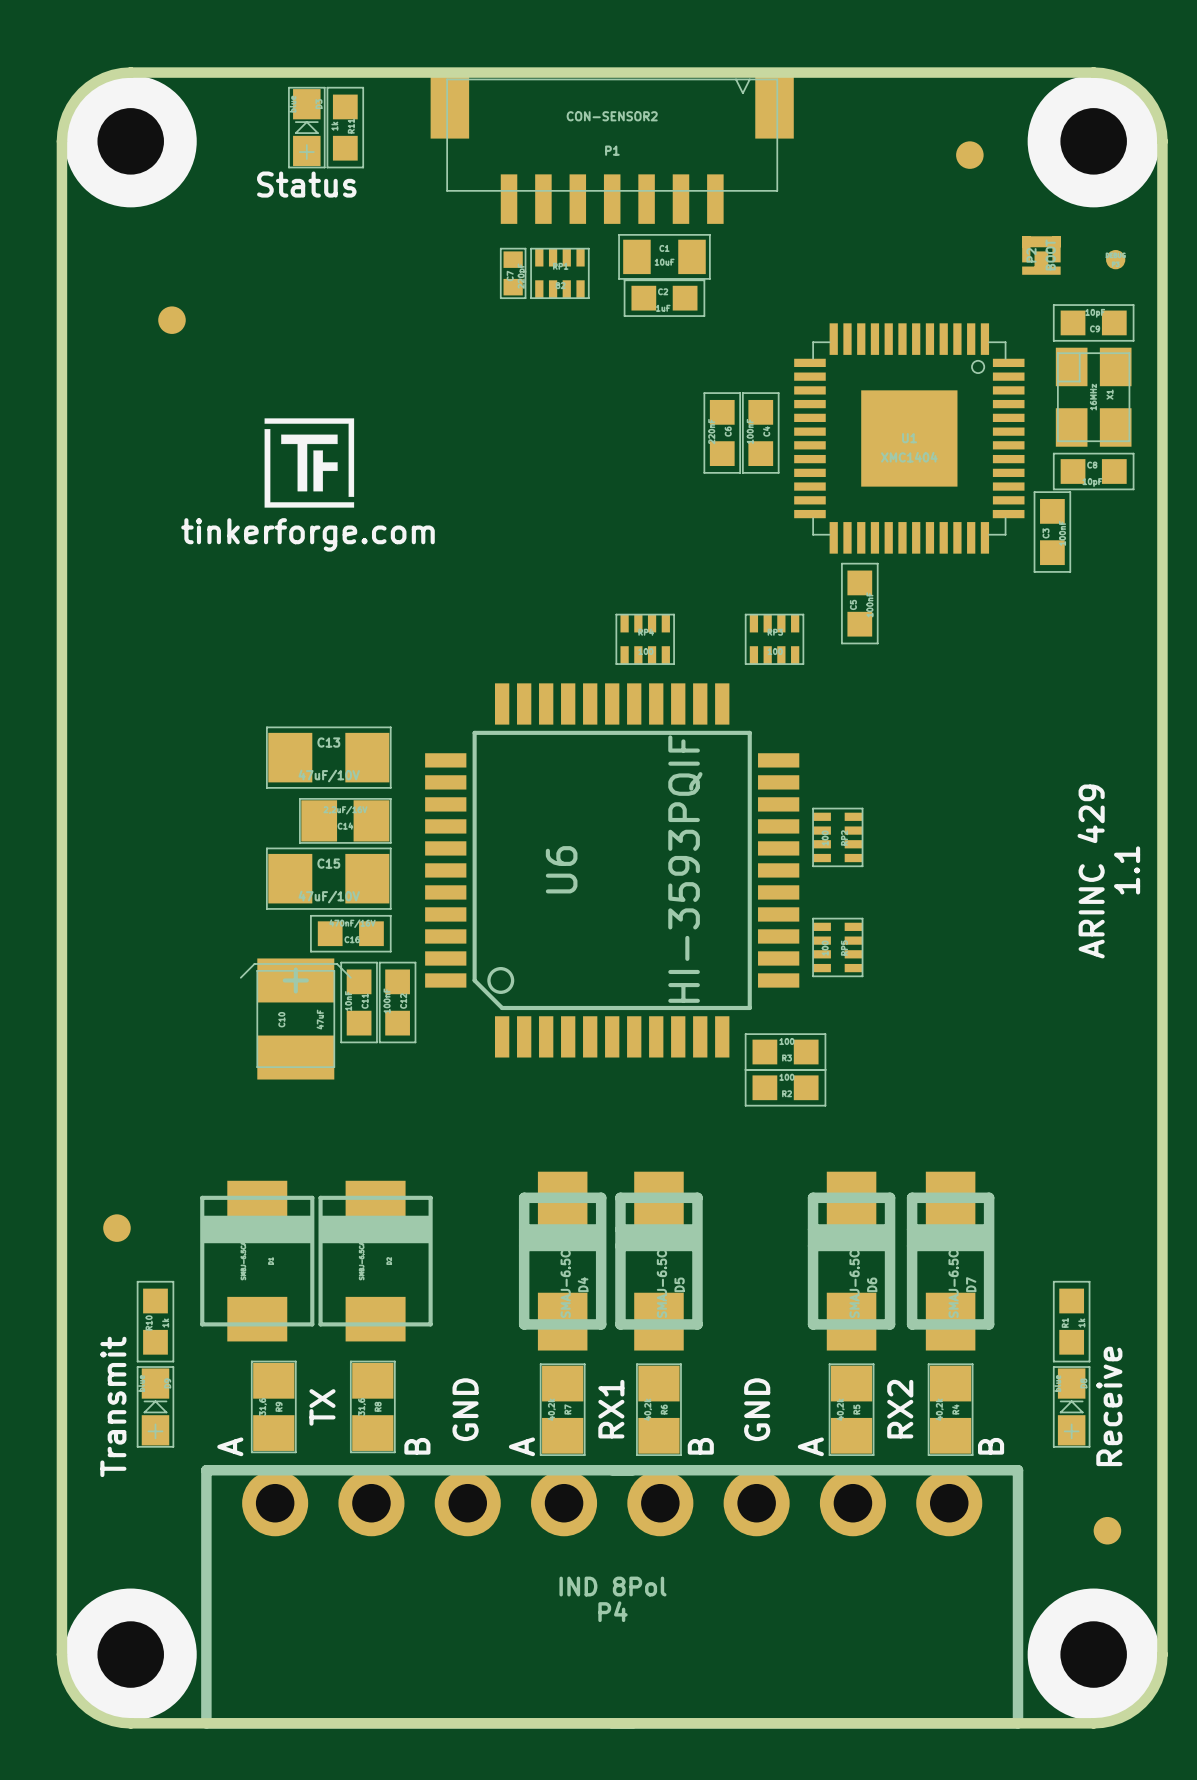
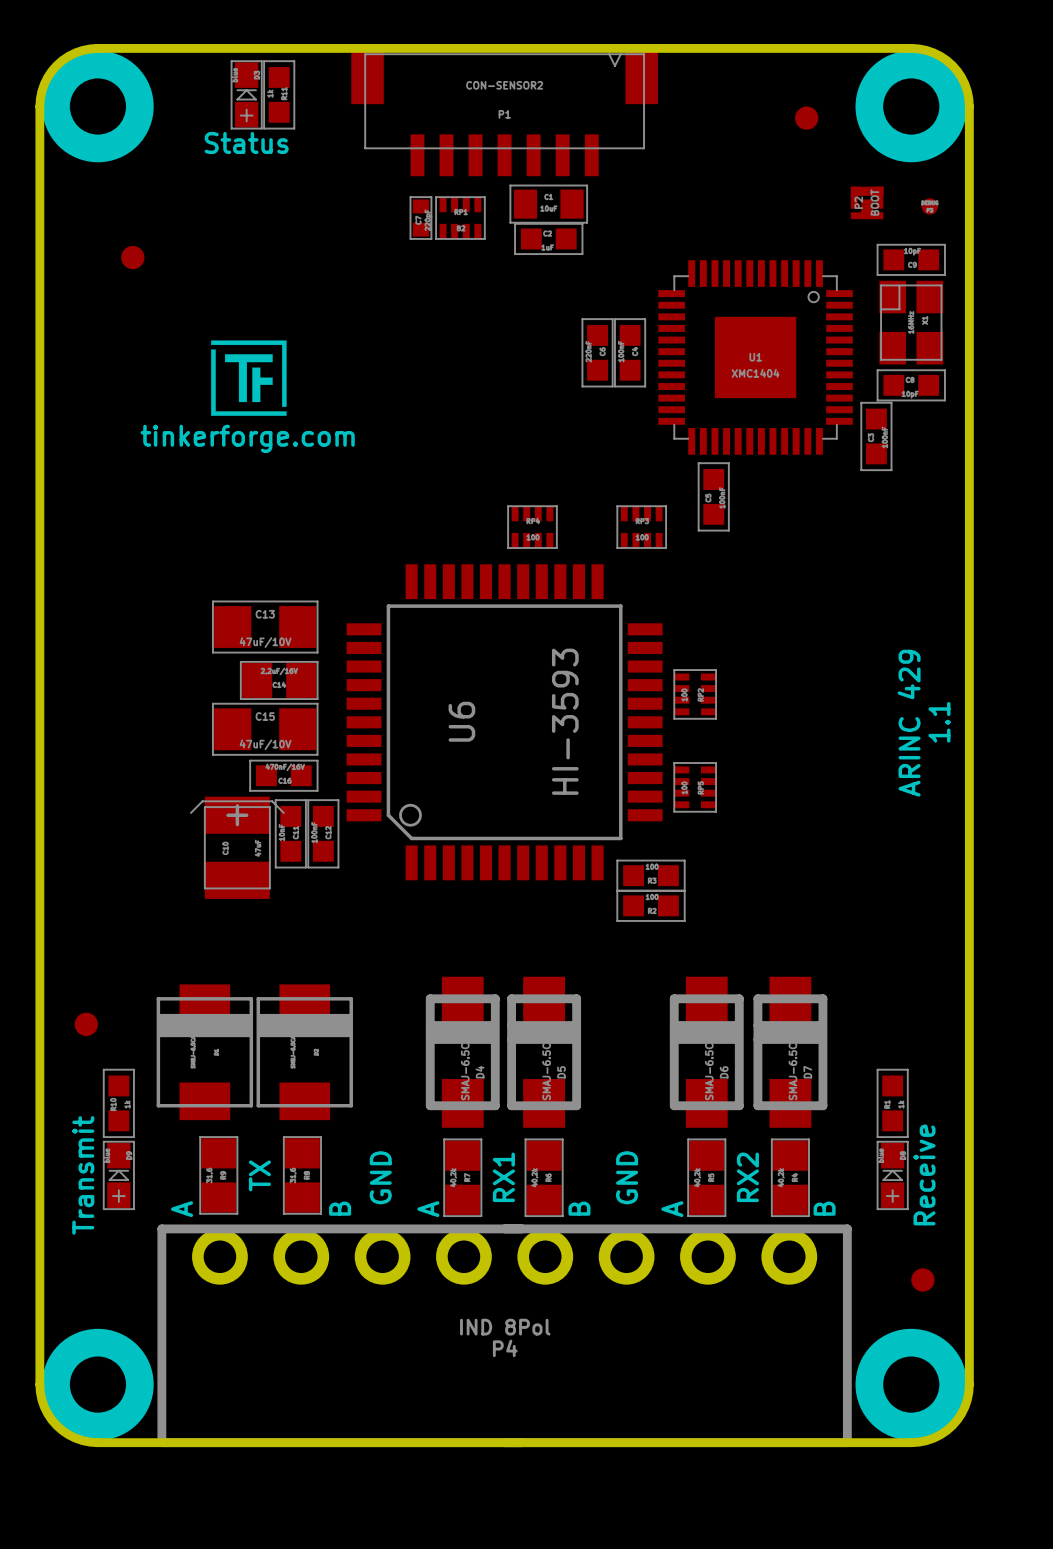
U6 value: HI-3593PQIF (685, 869) -> HI-3593 (565, 721)

